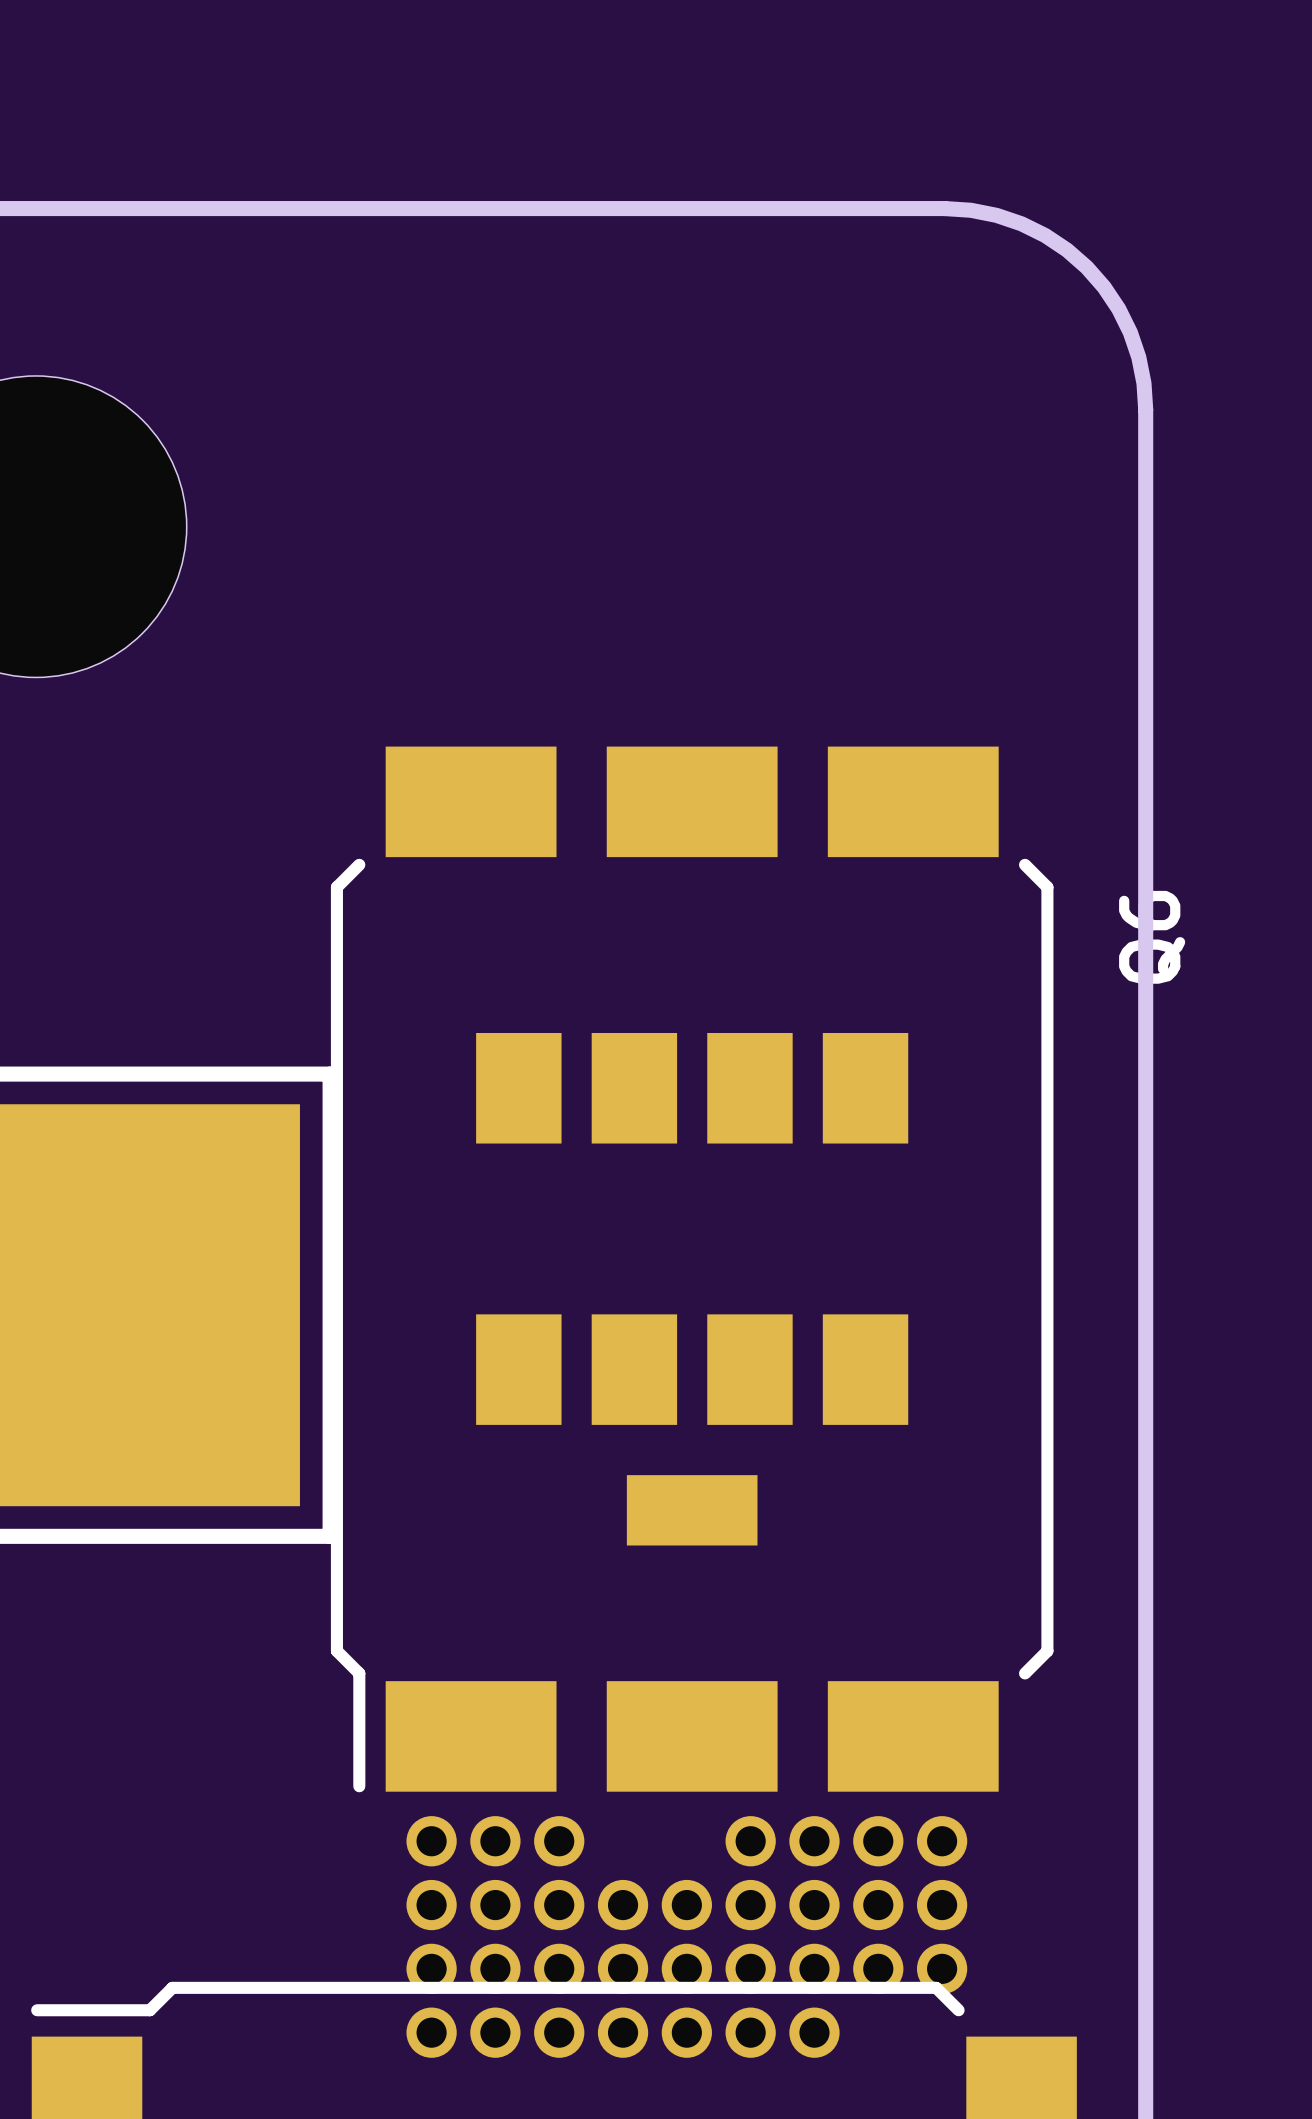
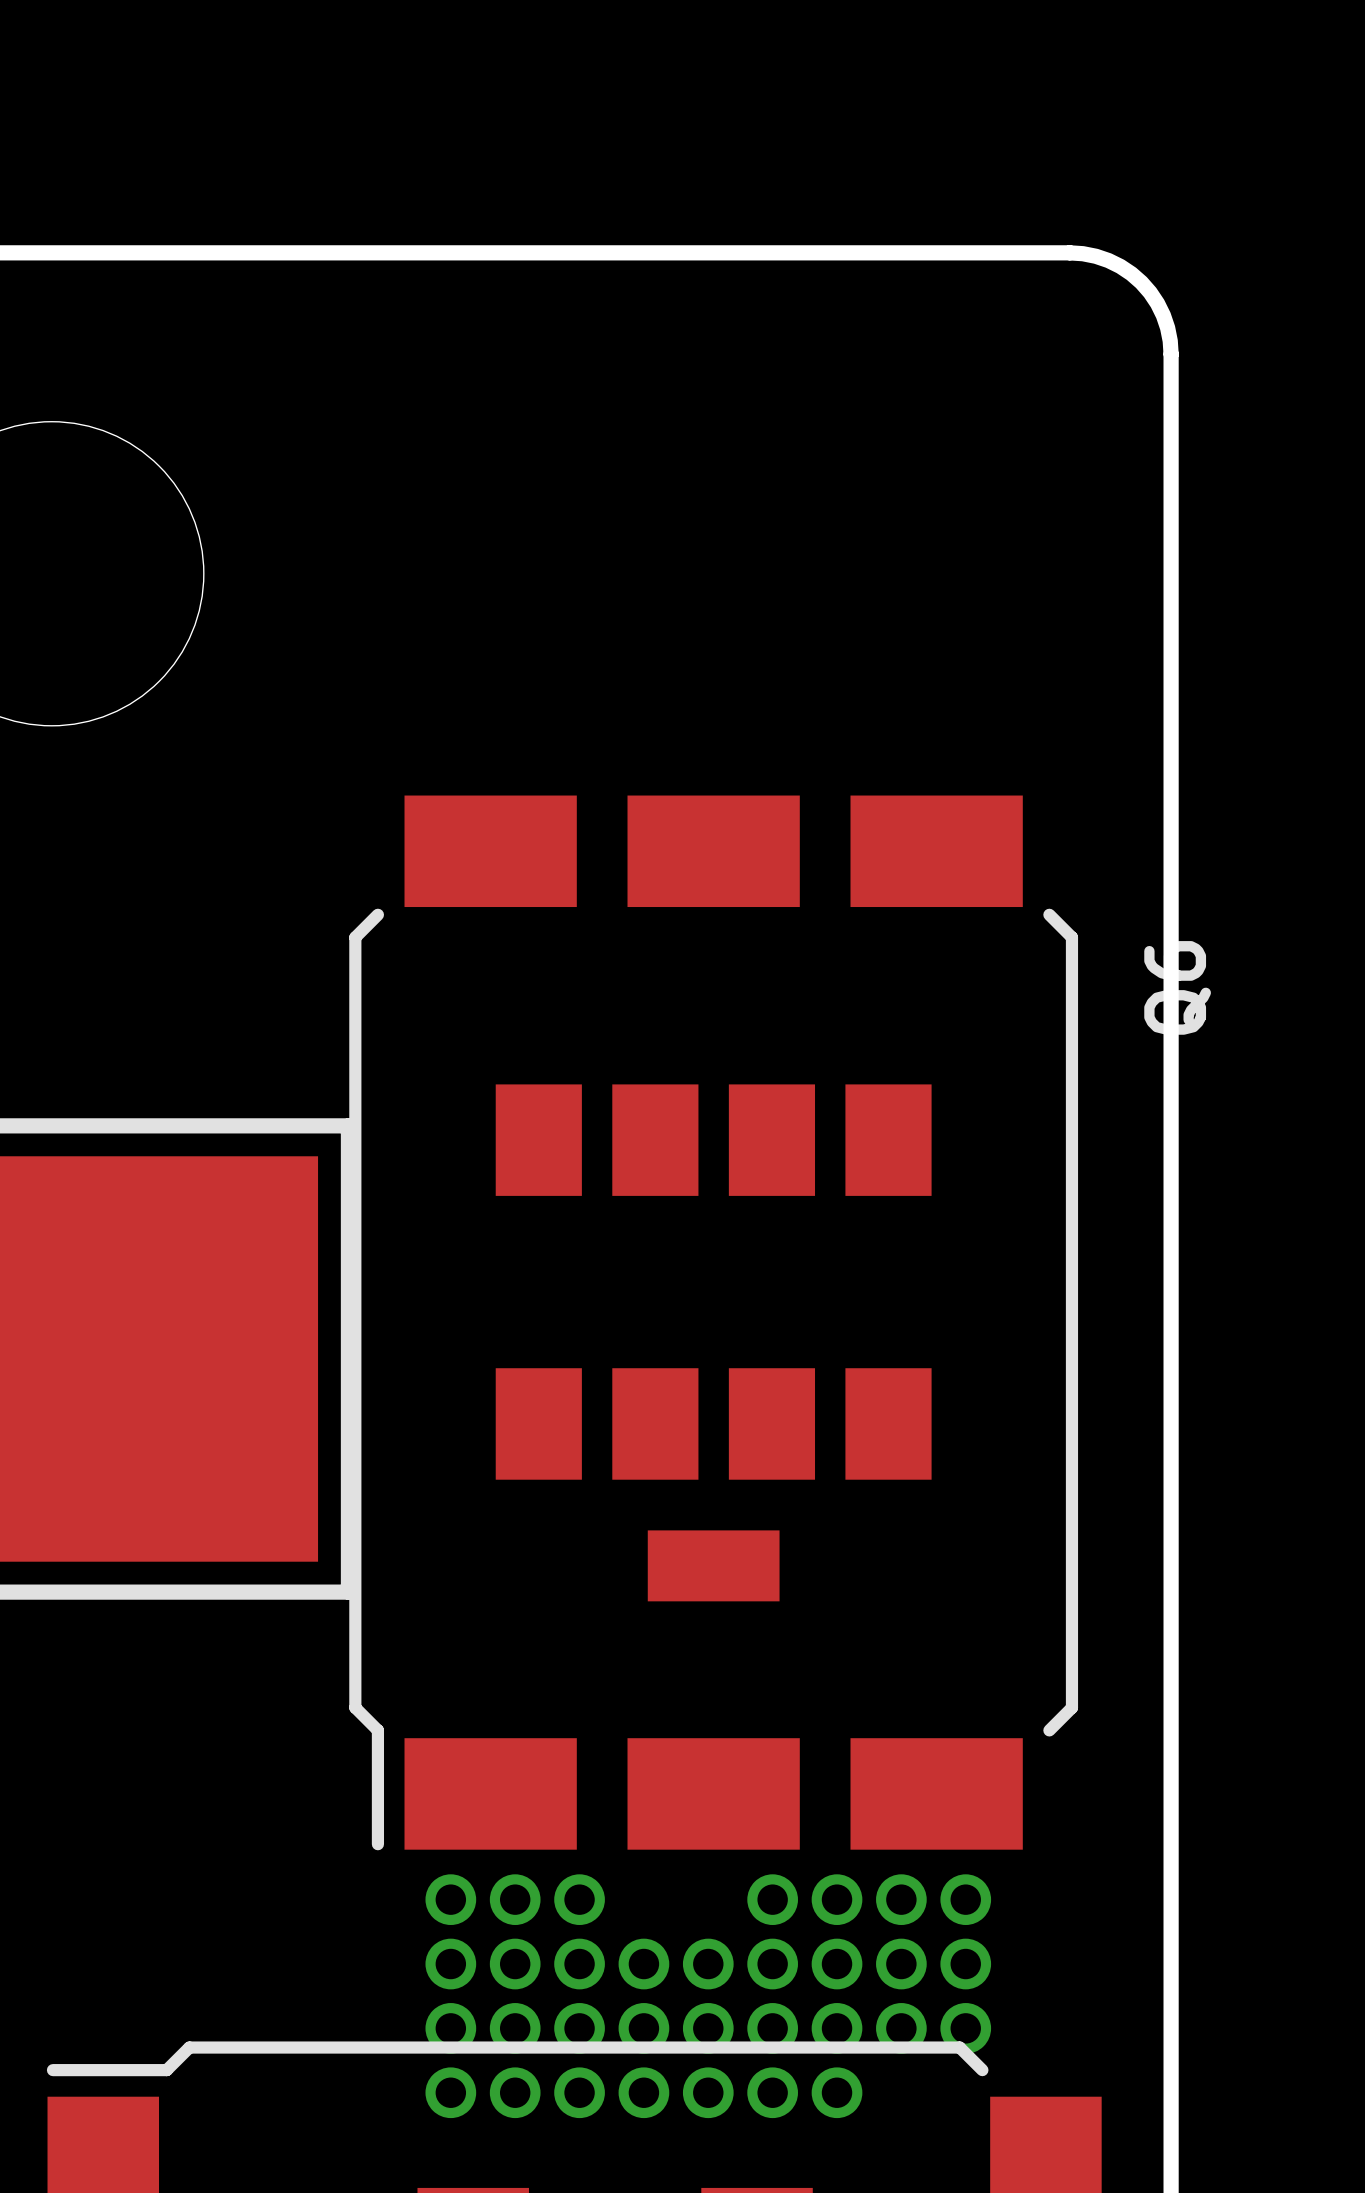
board edge: (944, 208) (970, 210) (996, 215) (1021, 223) (1045, 235) (1067, 250) (1086, 267) (1104, 287) (1118, 309) (1130, 332) (1138, 357) (1143, 383) (1145, 409) -> (968, 252) (1082, 253) (1108, 260) (1120, 266) (1141, 282) (1157, 303) (1167, 327) (1170, 340) (1171, 455)

